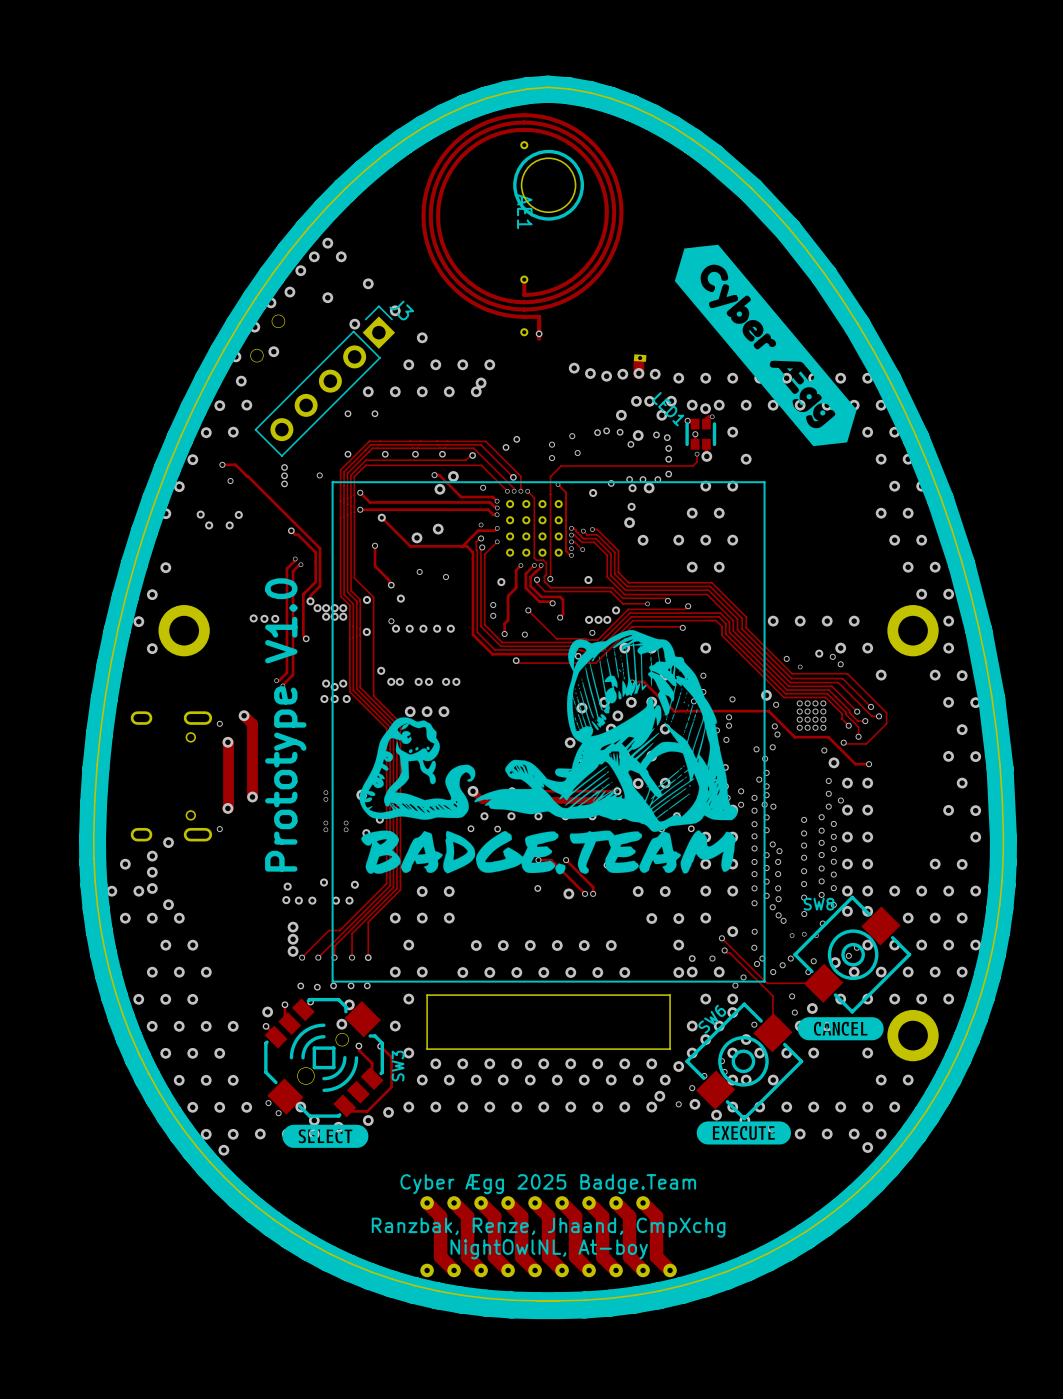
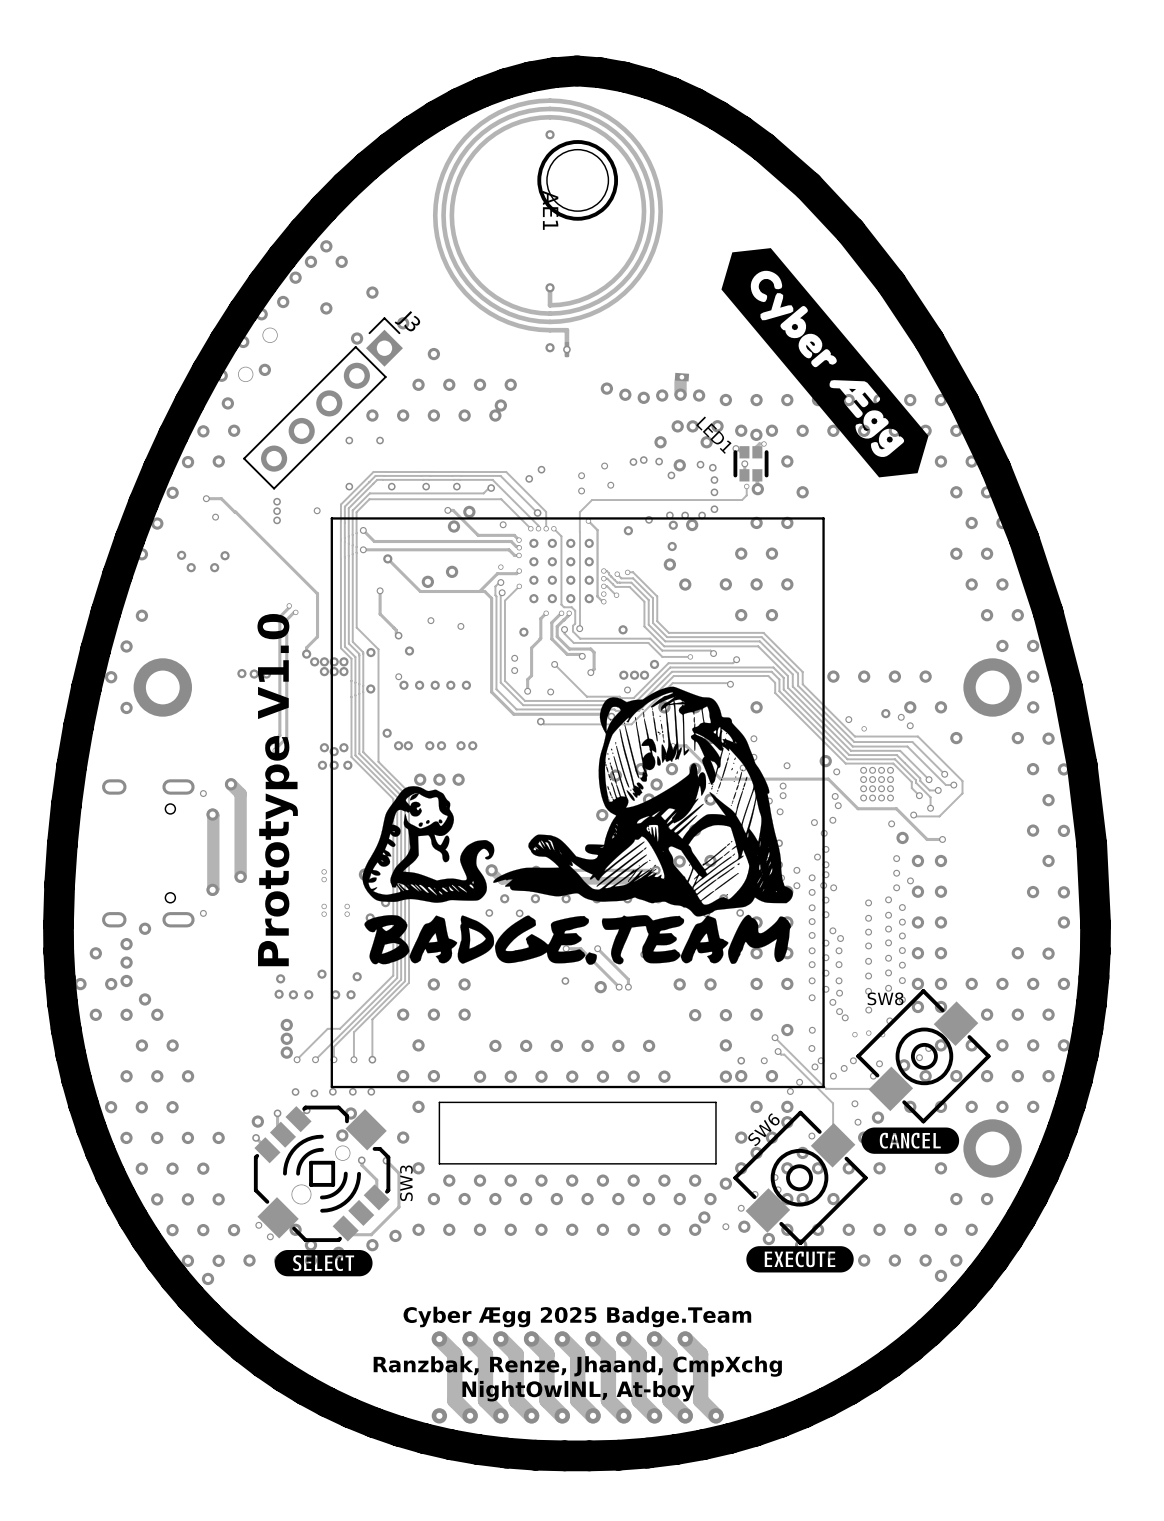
track: (291, 530) (315, 552) (315, 582) (303, 594) (303, 635) (306, 638) -> none
via: (291, 530) -> none
via: (306, 638) -> none

